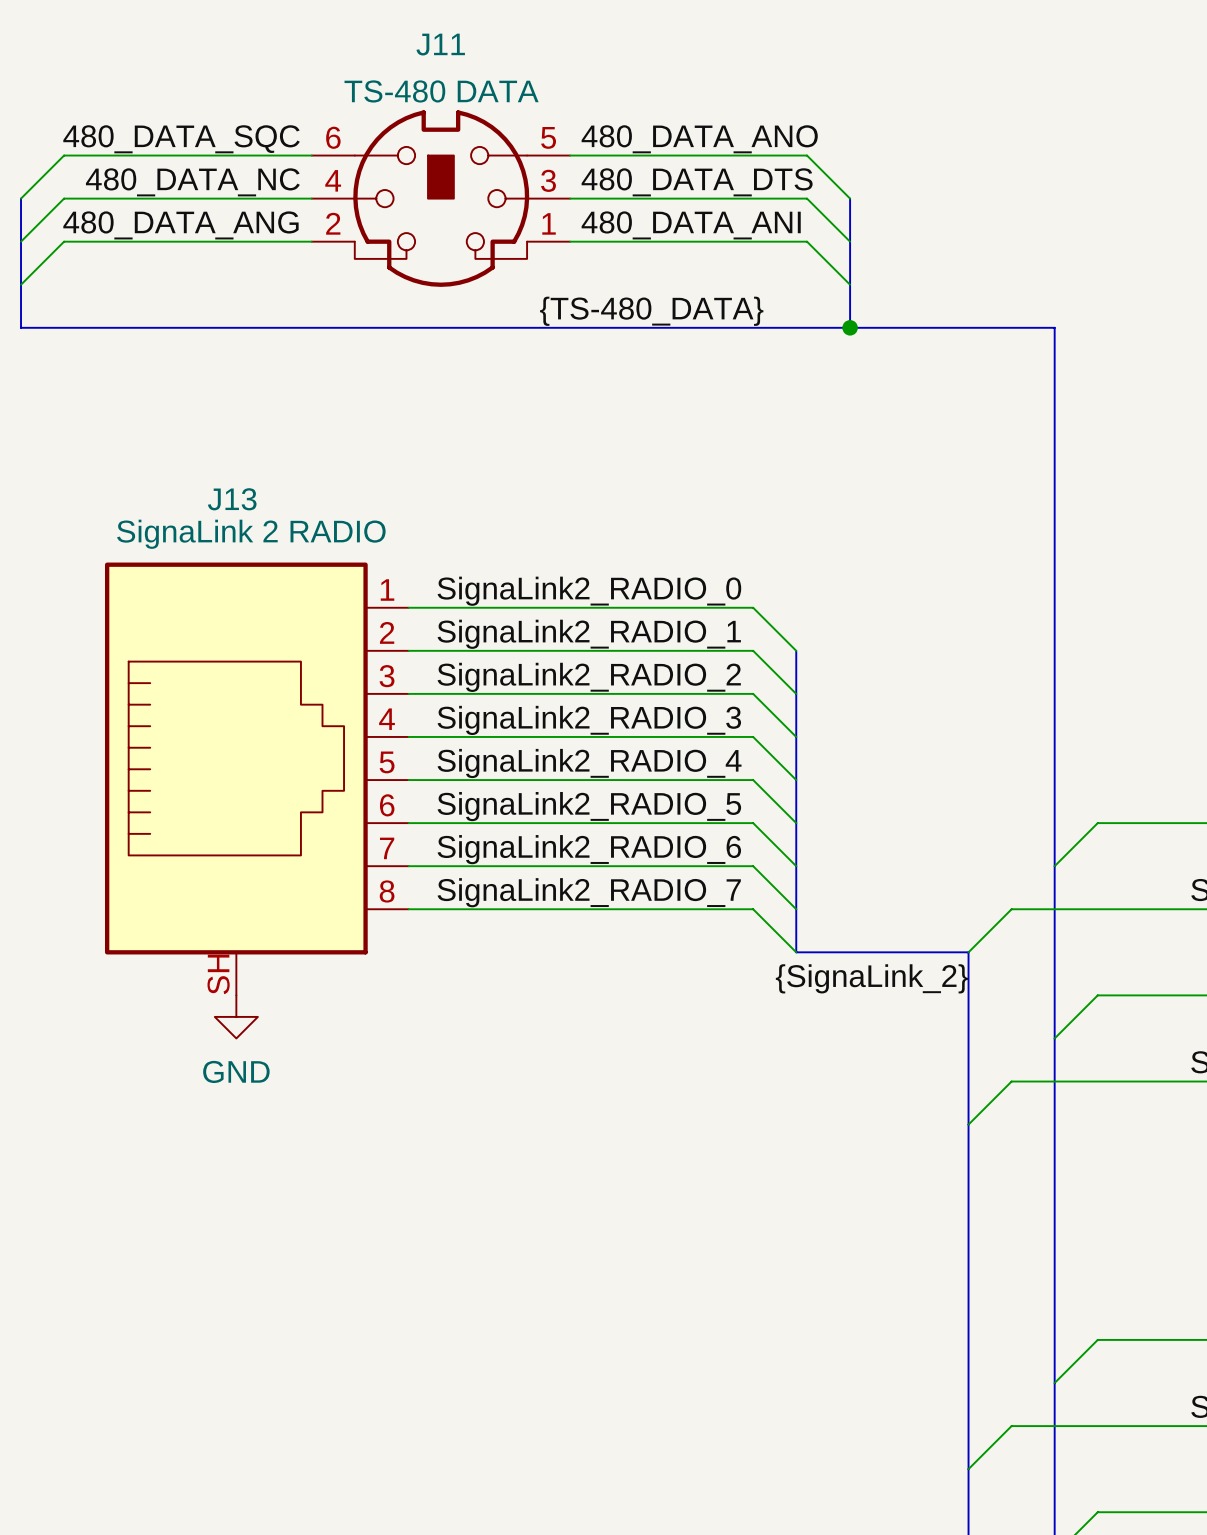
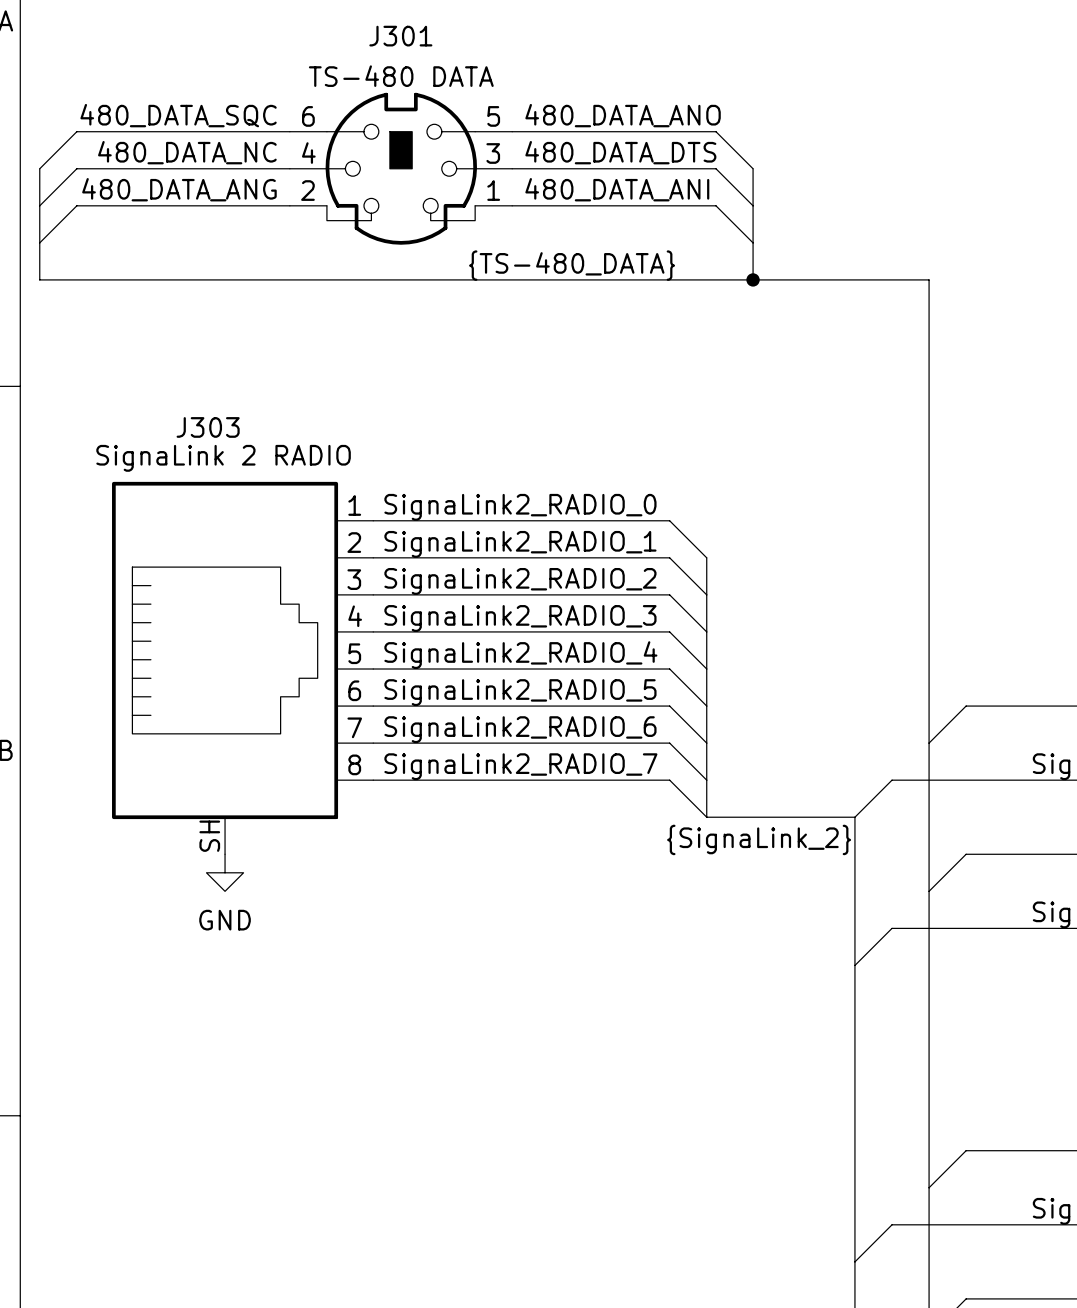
J11 name: J11 (440, 44) -> J301 (400, 36)
J13 name: J13 (232, 499) -> J303 (208, 427)

